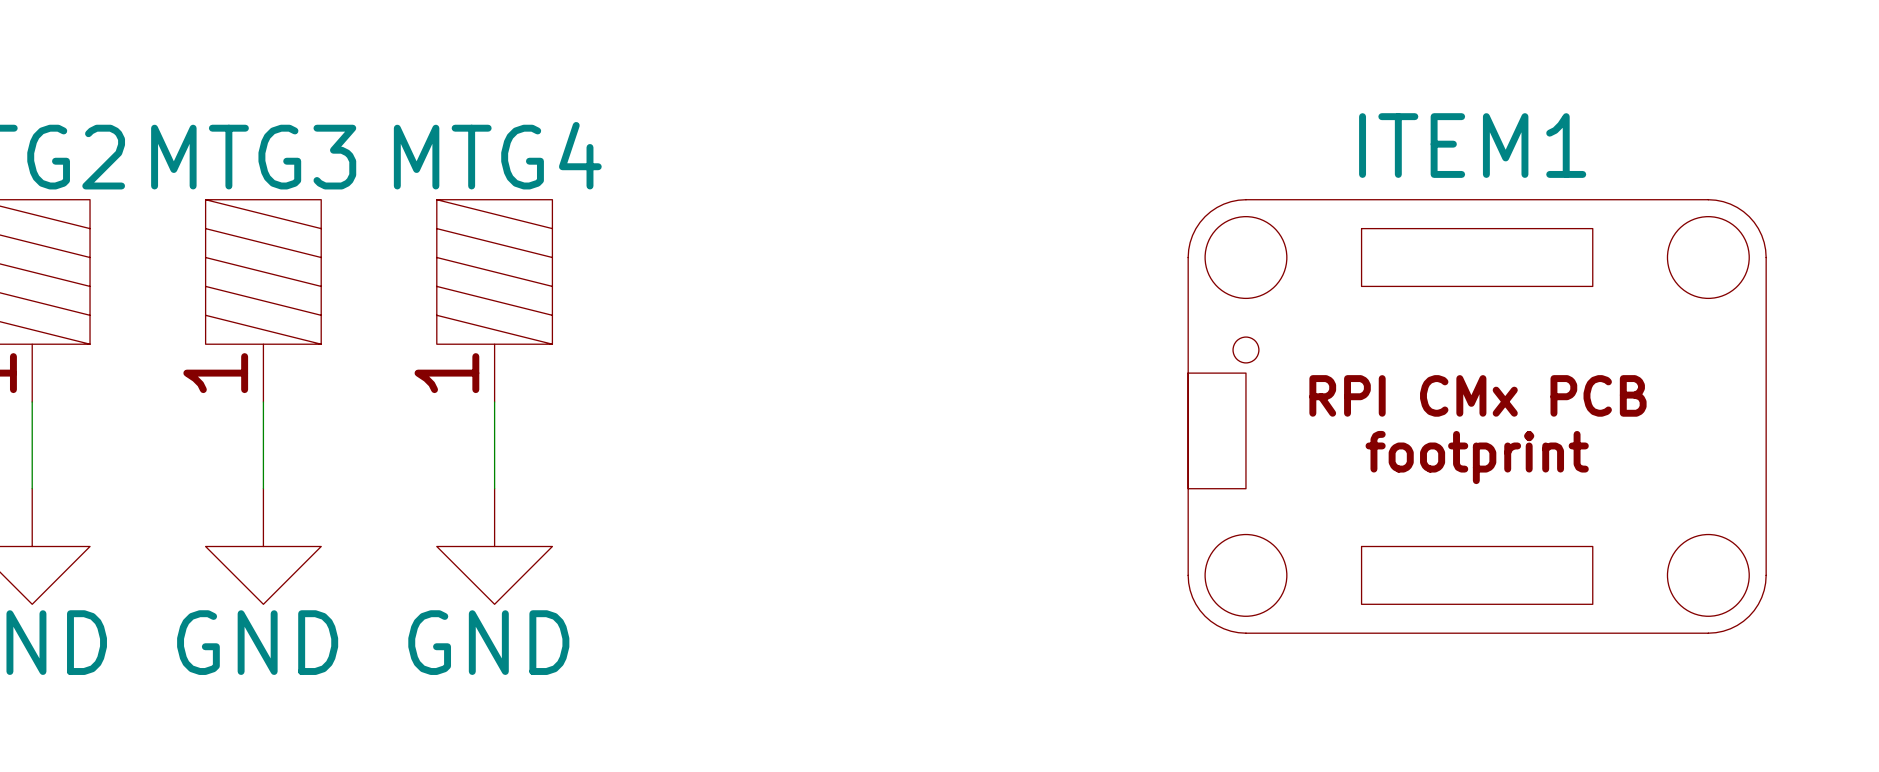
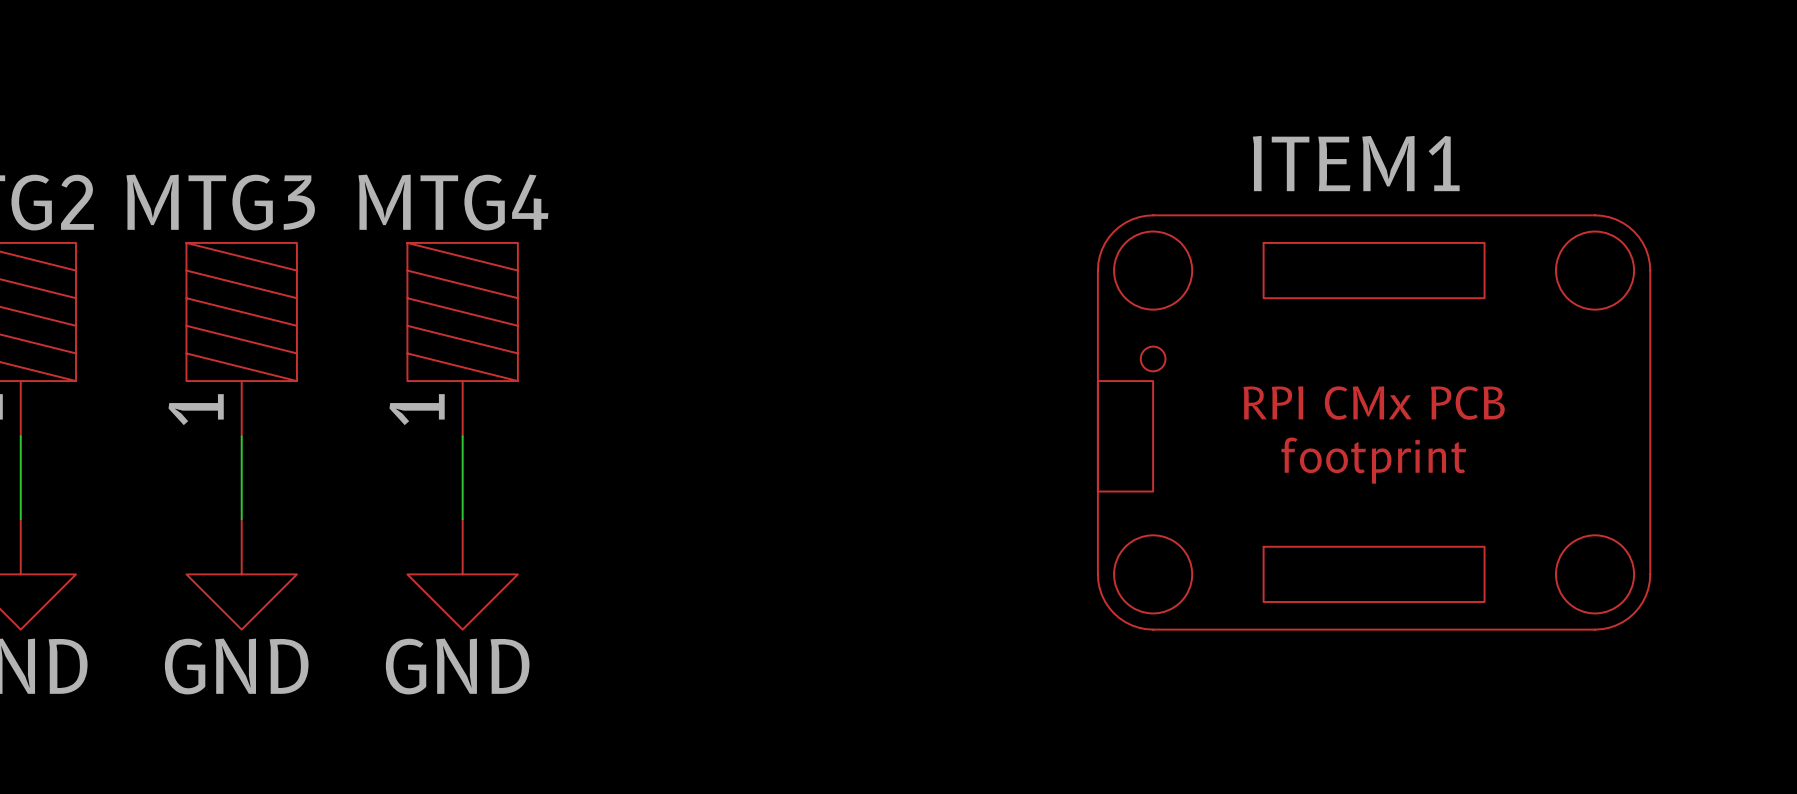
ITEM1 position: (1477, 416) -> (1374, 422)

